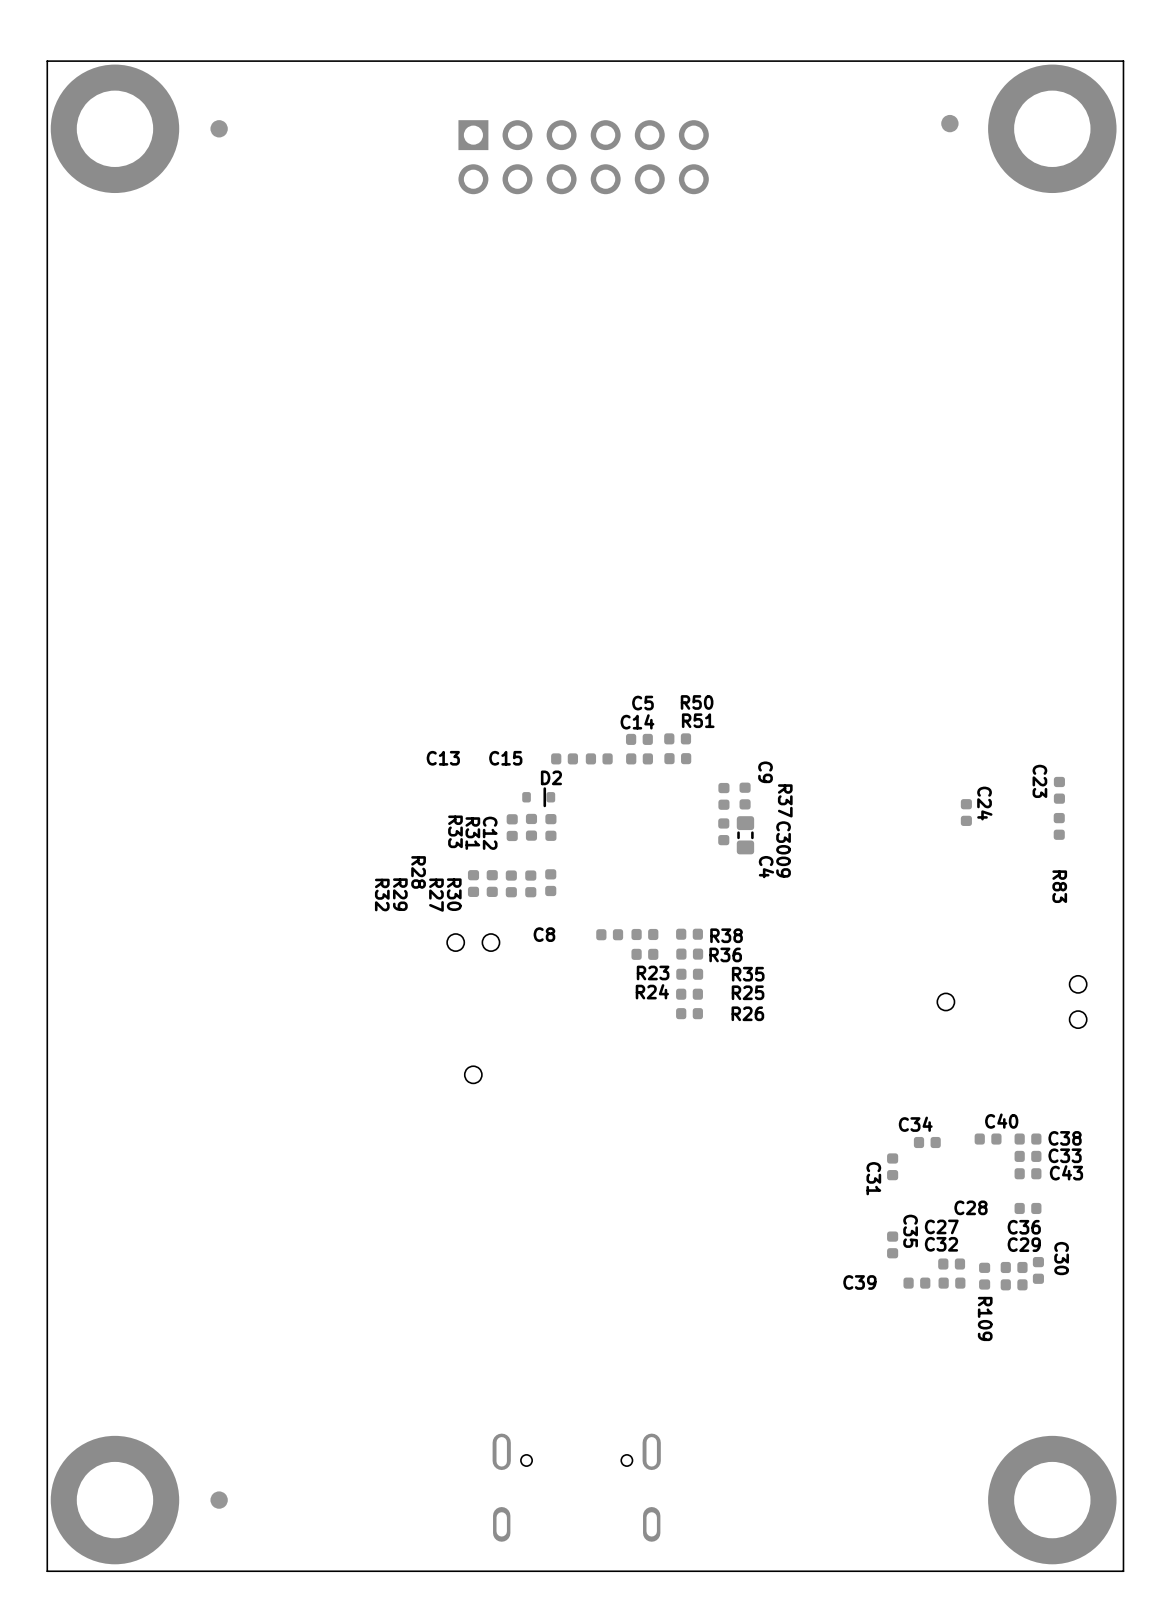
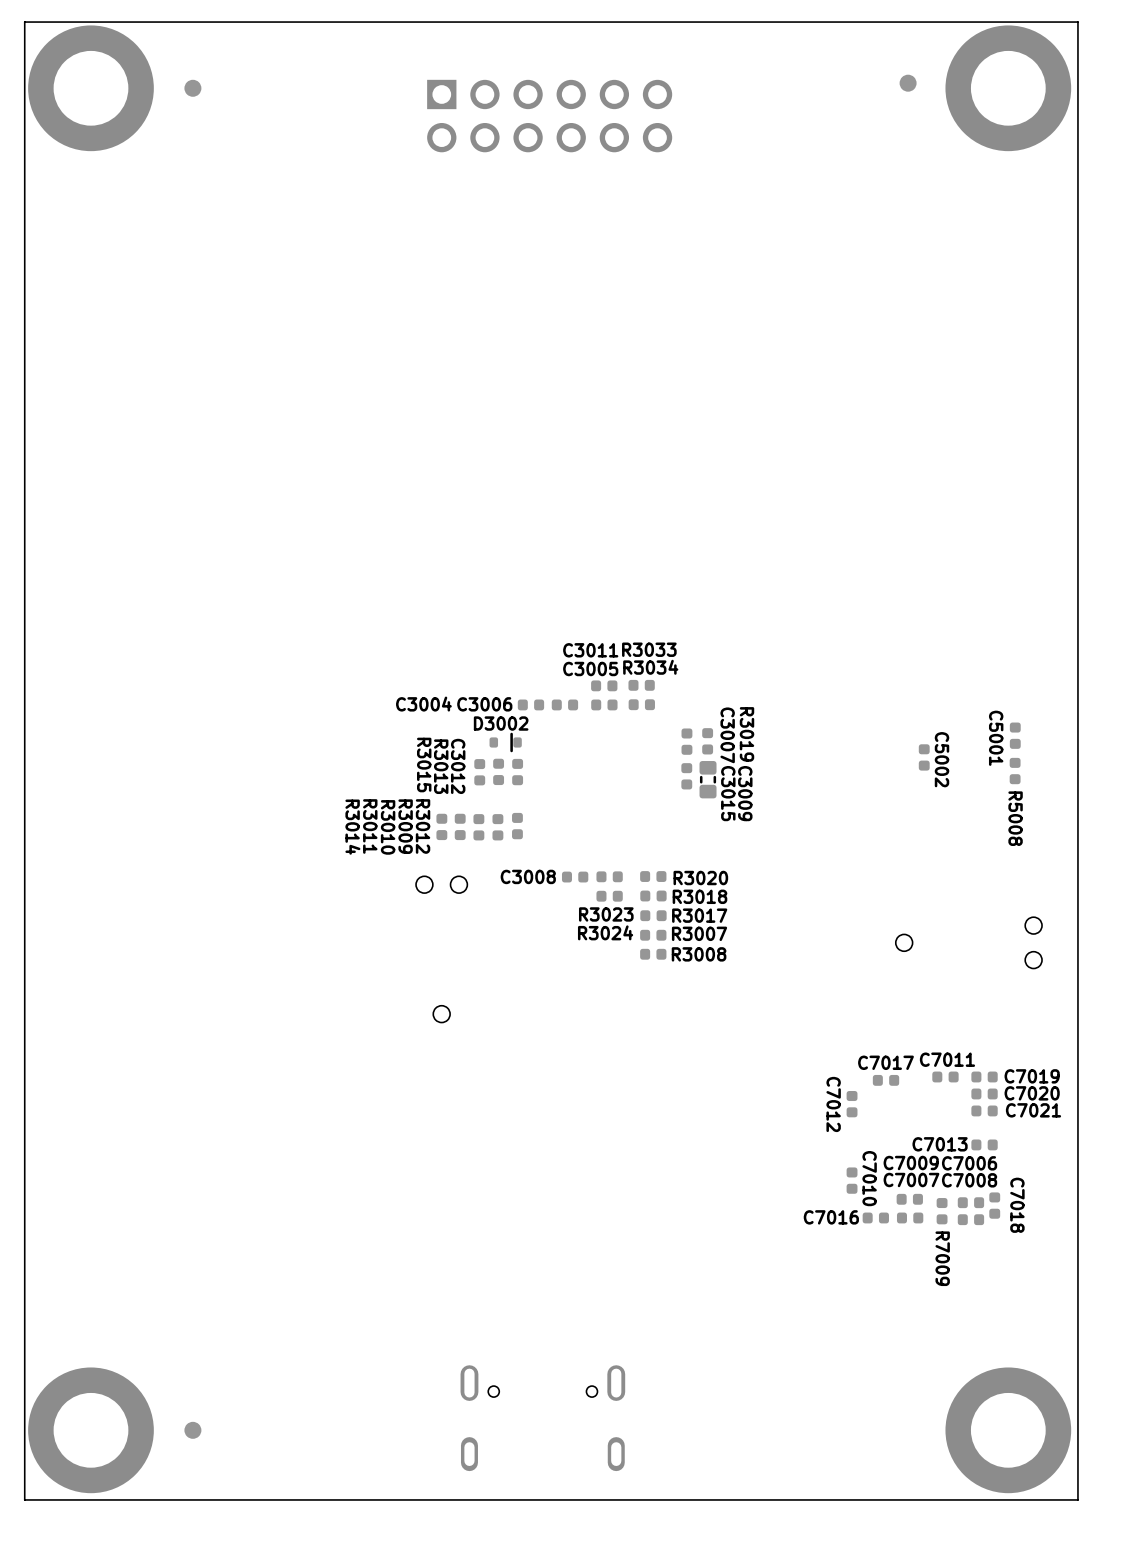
R50 name: R50 (697, 702) -> R3033 (649, 649)
C5 name: C5 (642, 703) -> C3011 (590, 650)
R51 name: R51 (698, 720) -> R3034 (650, 667)
C14 name: C14 (637, 721) -> C3005 (590, 668)
C13 name: C13 (443, 758) -> C3004 (423, 704)
C15 name: C15 (505, 758) -> C3006 (484, 704)
C9 name: C9 (765, 772) -> C3007 (727, 735)
D2 name: D2 (551, 777) -> D3002 (501, 723)
C23 name: C23 (1039, 781) -> C5001 (996, 738)
R37 name: R37 (785, 800) -> R3019 (746, 734)
C24 name: C24 (984, 803) -> C5002 (942, 759)
R33 name: R33 (455, 831) -> R3015 (424, 764)
R31 name: R31 (472, 833) -> R3013 (441, 766)
C12 name: C12 (490, 833) -> C3012 (458, 766)
C4 name: C4 (766, 867) -> C3015 (728, 793)
R28 name: R28 (418, 872) -> R3010 (388, 827)
R83 name: R83 (1059, 886) -> R5008 (1015, 818)
R29 name: R29 (400, 894) -> R3011 (370, 826)
R30 name: R30 (454, 894) -> R3012 (423, 826)
R32 name: R32 (382, 895) -> R3014 (352, 827)
R27 name: R27 (436, 895) -> R3009 (405, 826)
C8 name: C8 (544, 934) -> C3008 (528, 876)
R38 name: R38 (726, 935) -> R3020 (700, 878)
R36 name: R36 (725, 954) -> R3018 (699, 896)
R23 name: R23 (653, 972) -> R3023 (606, 914)
R35 name: R35 (748, 974) -> R3017 (699, 915)
R24 name: R24 (652, 991) -> R3024 (605, 932)
R25 name: R25 (748, 992) -> R3007 (699, 933)
R26 name: R26 (747, 1013) -> R3008 (699, 954)
C40 name: C40 (1001, 1121) -> C7011 (947, 1059)
C34 name: C34 (915, 1124) -> C7017 (885, 1062)
C38 name: C38 (1065, 1138) -> C7019 (1032, 1076)
C33 name: C33 (1065, 1155) -> C7020 (1032, 1093)
C43 name: C43 (1066, 1172) -> C7021 (1033, 1110)
C31 name: C31 (873, 1178) -> C7012 (833, 1104)
C28 name: C28 (970, 1207) -> C7013 (940, 1144)
C27 name: C27 (941, 1226) -> C7009 (911, 1163)
C36 name: C36 (1024, 1227) -> C7006 (969, 1163)
C35 name: C35 (910, 1231) -> C7010 (869, 1178)
C32 name: C32 (941, 1244) -> C7007 (911, 1180)
C29 name: C29 (1024, 1244) -> C7008 (969, 1180)
C30 name: C30 (1061, 1258) -> C7018 (1017, 1205)
C39 name: C39 (859, 1282) -> C7016 (831, 1217)
R109 name: R109 (985, 1318) -> R7009 (942, 1258)

